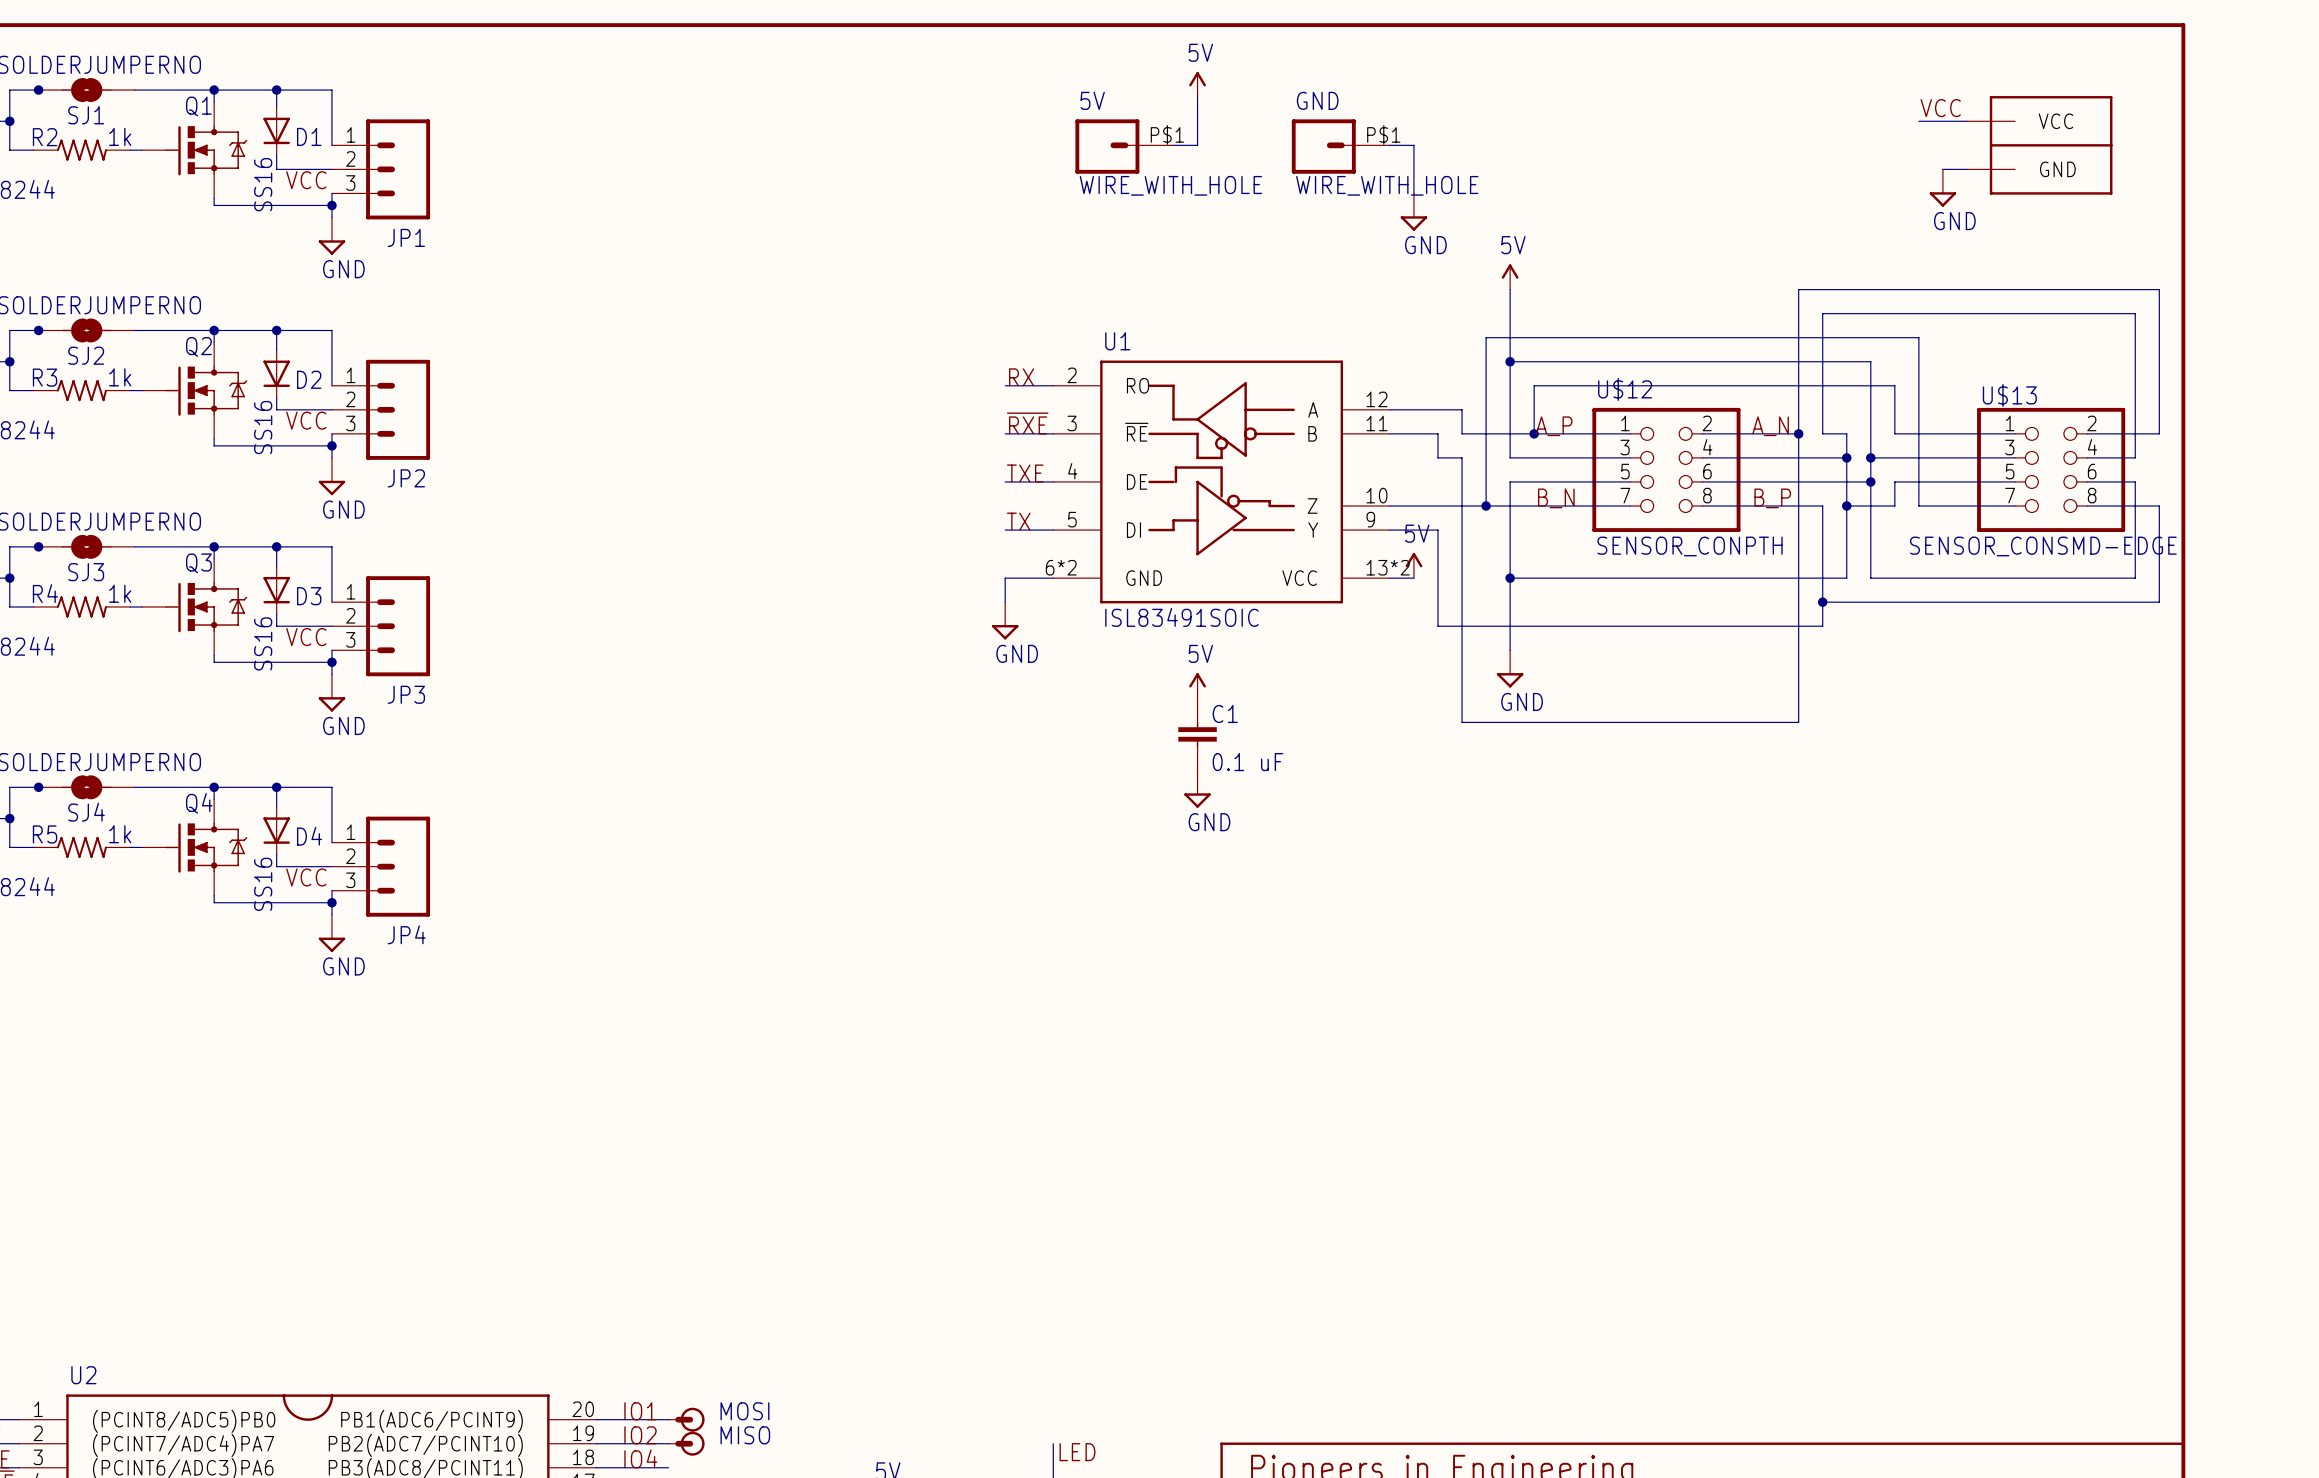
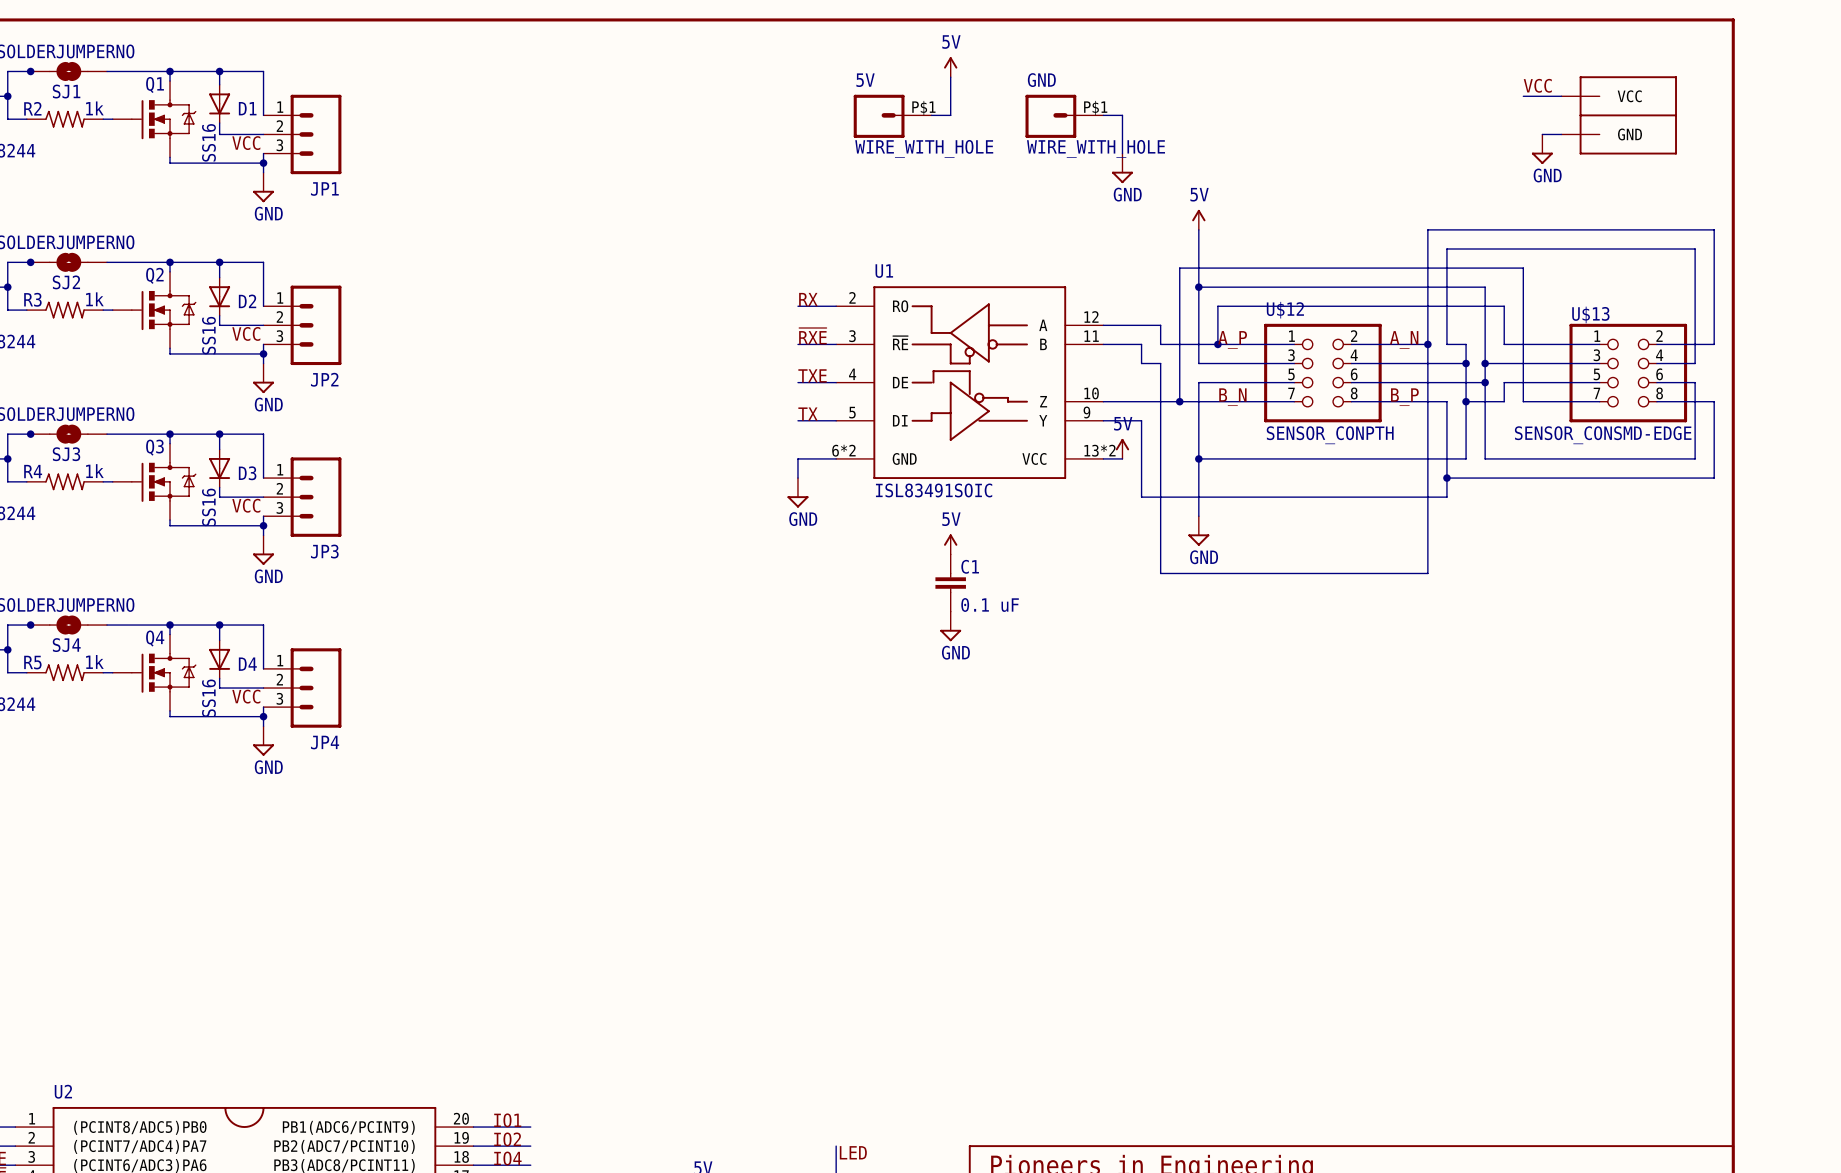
MOSI: (686, 1419) -> none
MISO: (686, 1443) -> none

